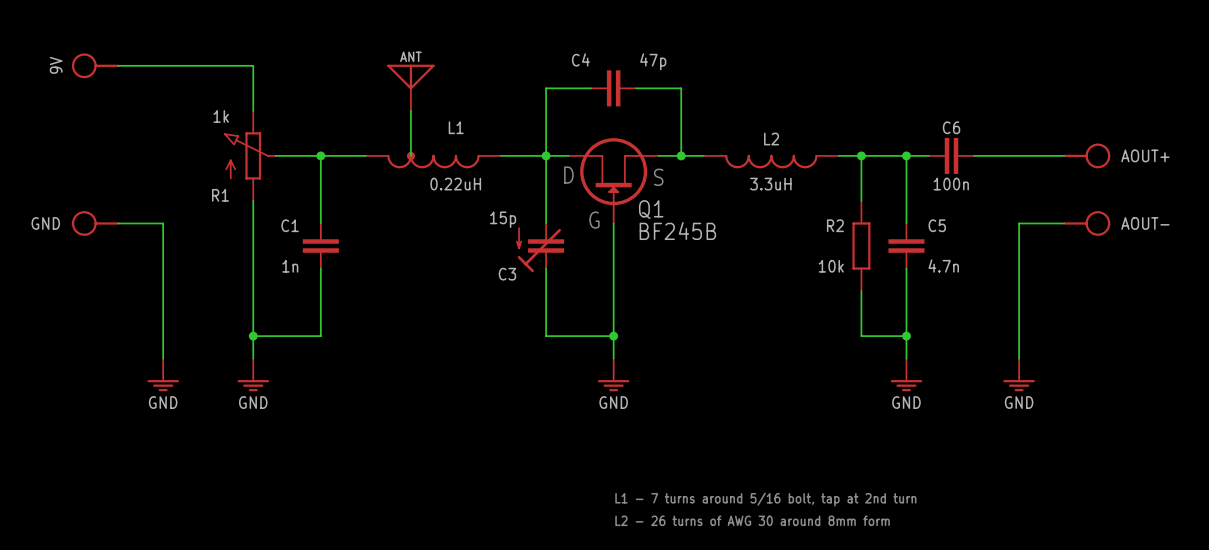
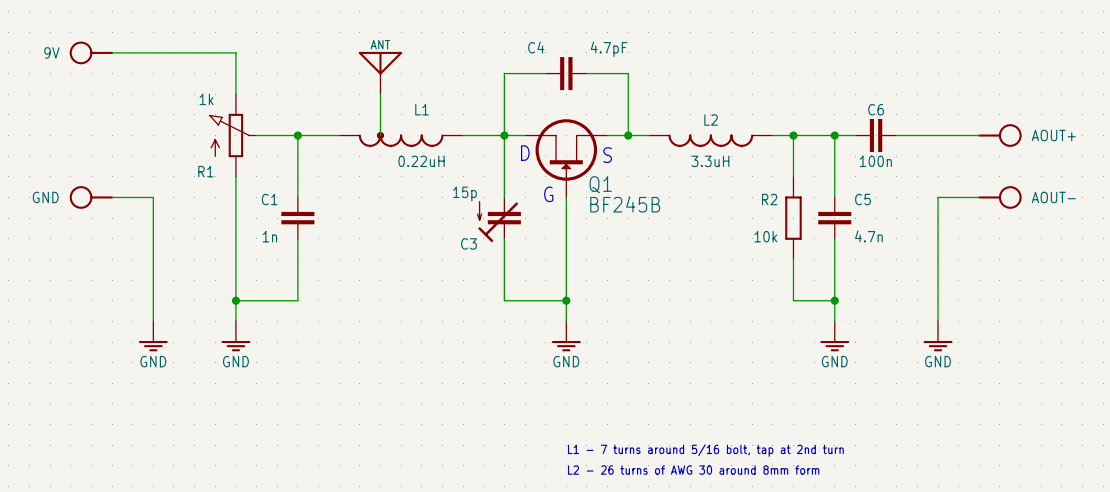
C4 value: 47p (653, 61) -> 4.7pF (609, 49)
9V name rotation: 0° (56, 65) -> 90° clockwise (51, 52)

